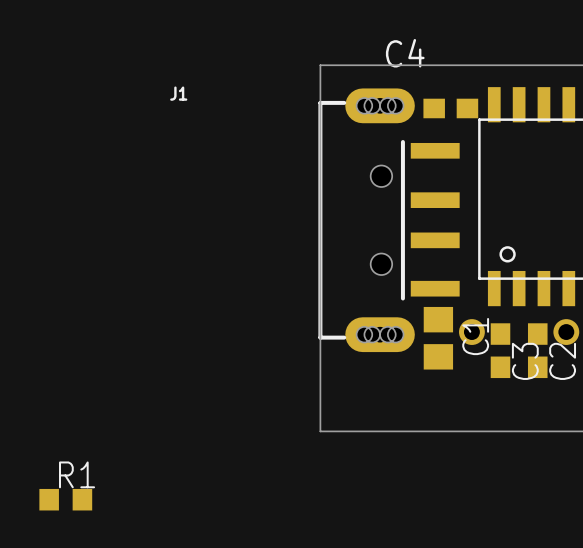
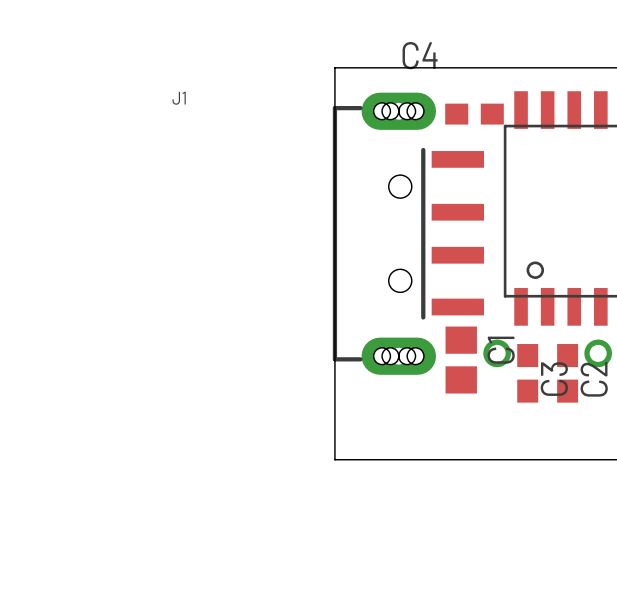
R1: (65, 499) -> none

